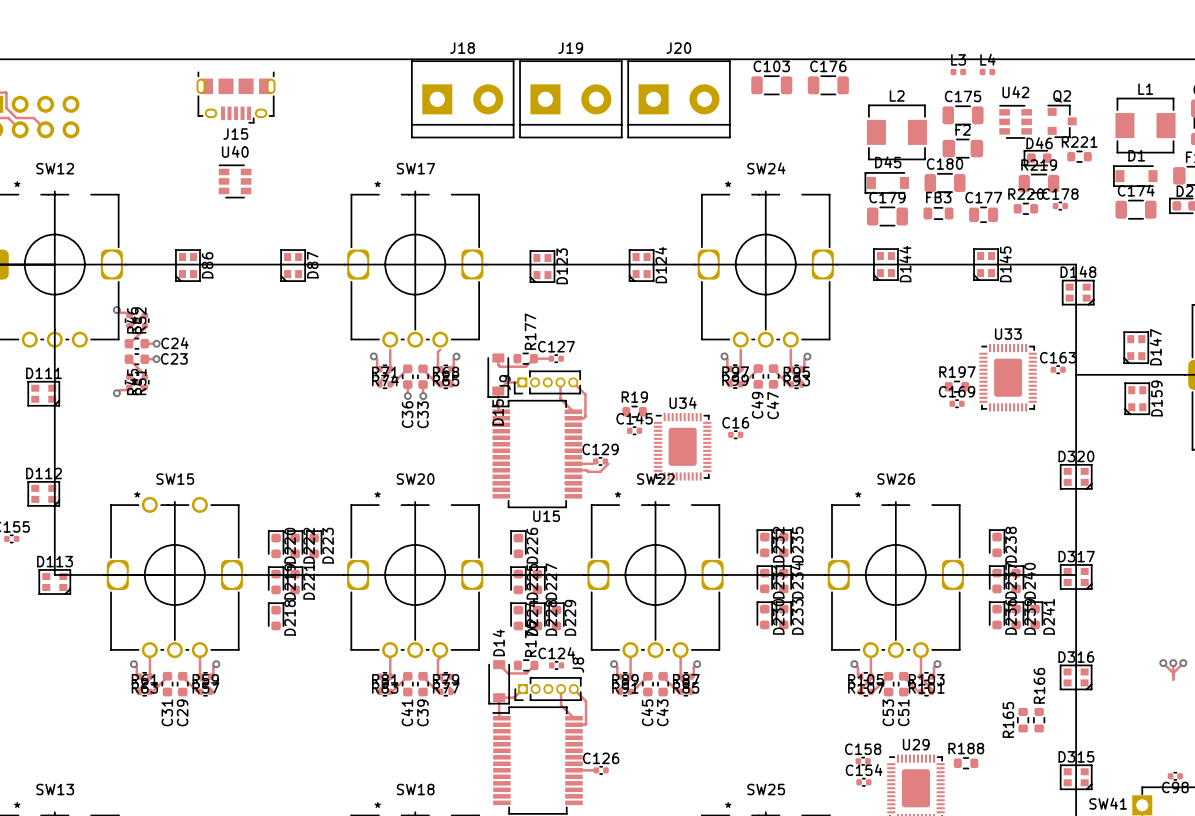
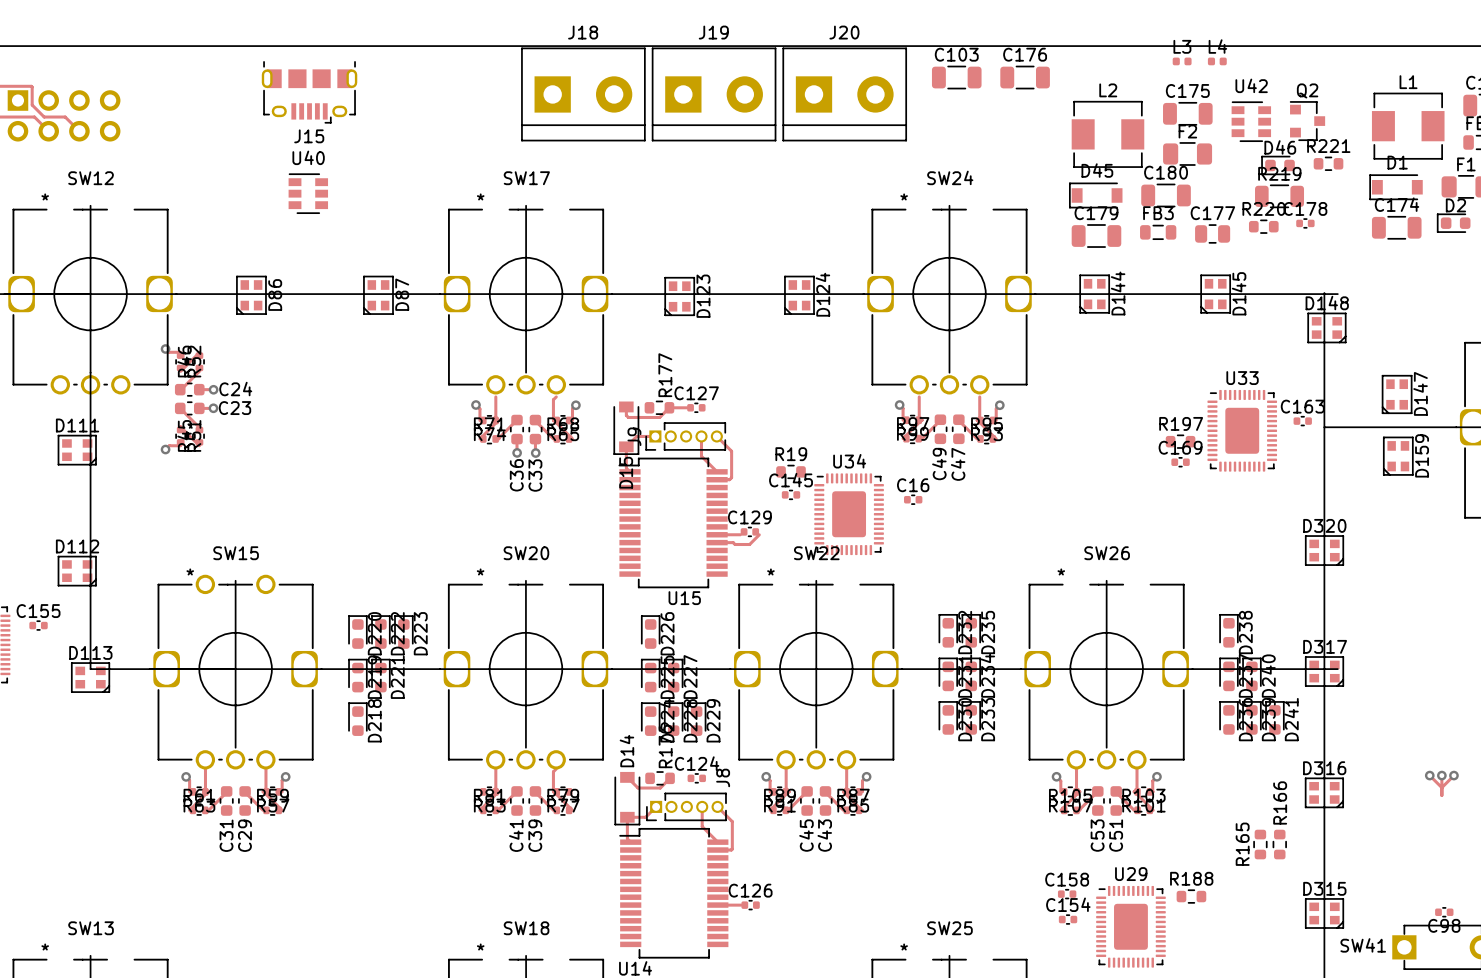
line: none -> (1324, 292) (1337, 294)
line: none -> (1324, 669) (1337, 669)

